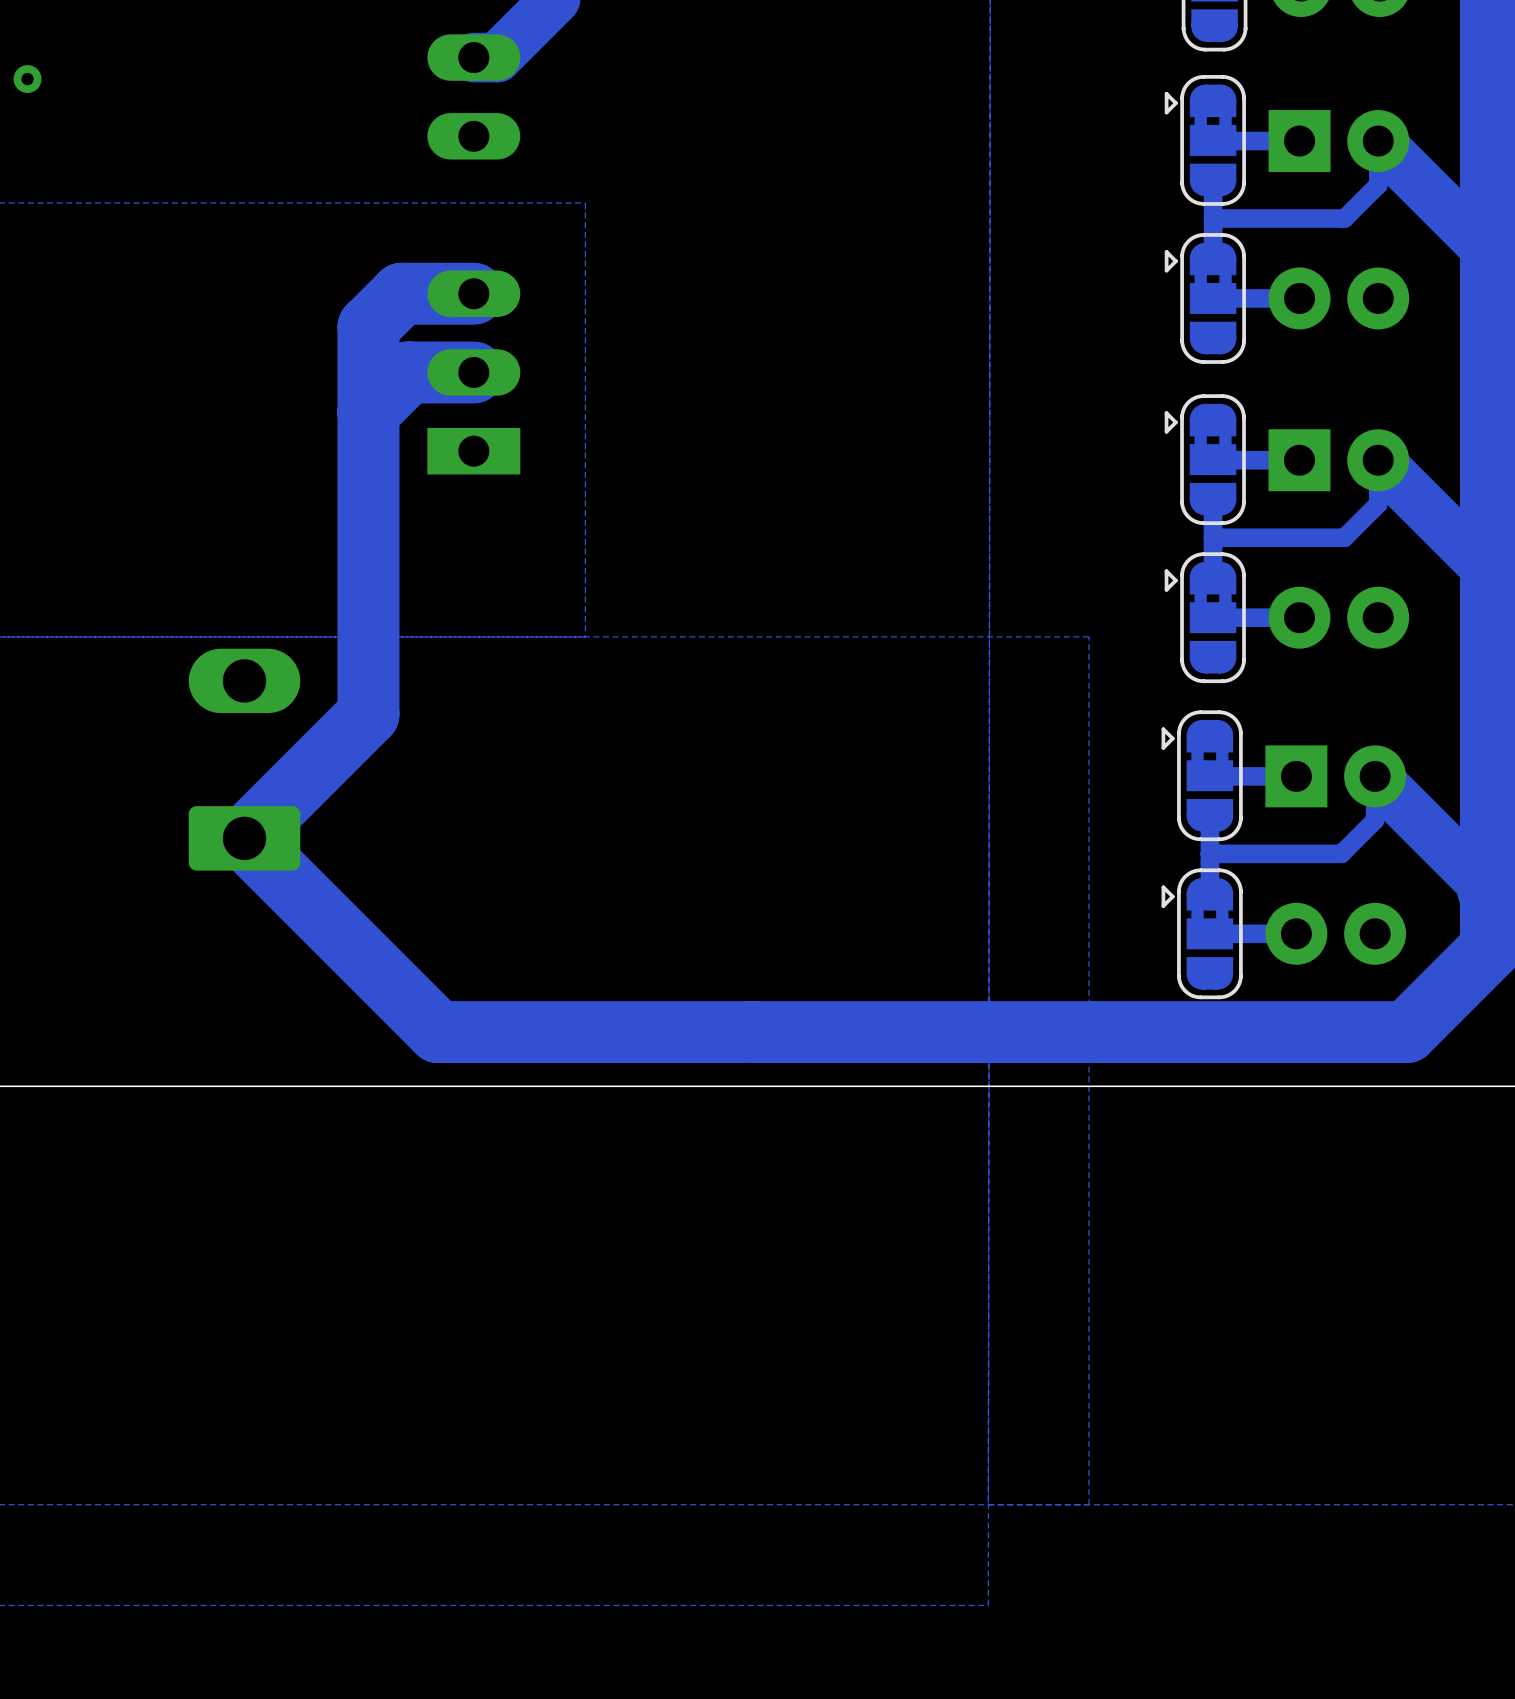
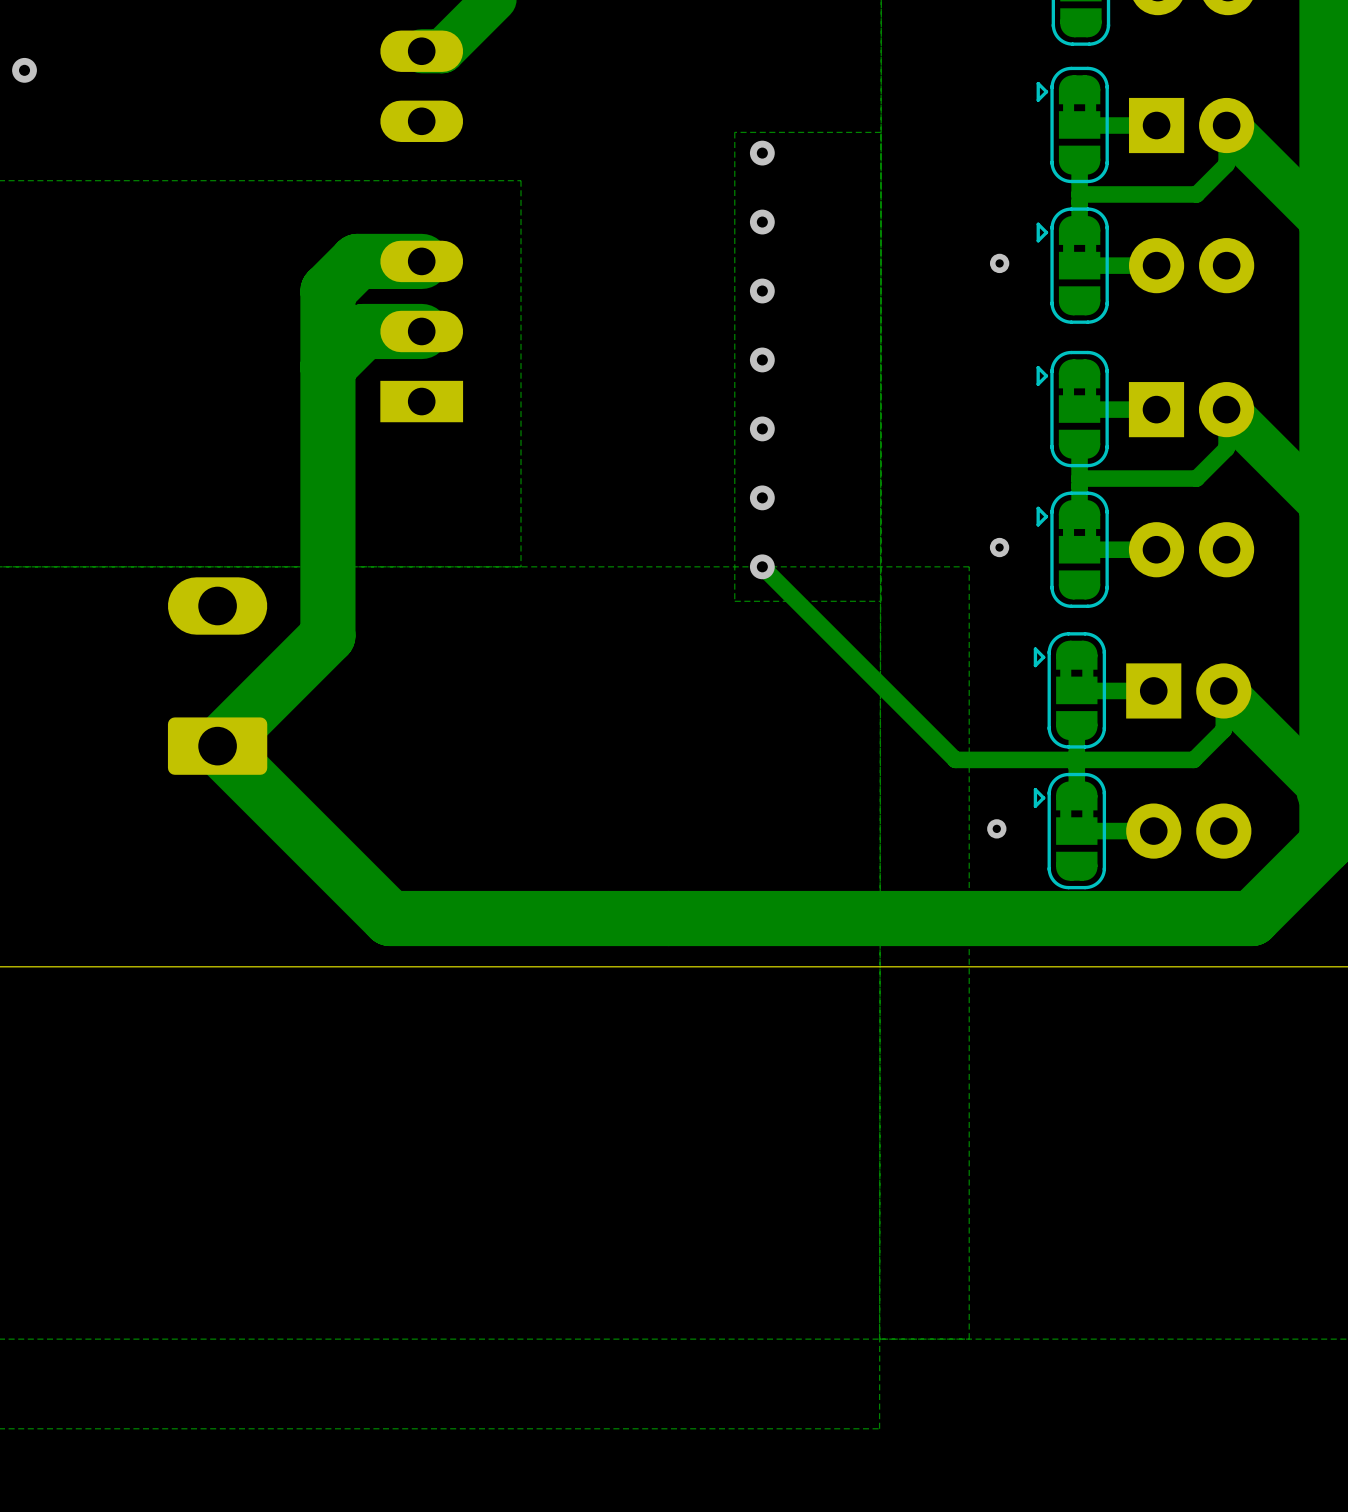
zone outline: none -> (880, 132) (734, 132) (734, 601) (880, 601) (880, 132)
via: none -> (762, 153)
via: none -> (762, 222)
via: none -> (999, 263)
via: none -> (762, 291)
via: none -> (762, 359)
via: none -> (762, 428)
via: none -> (762, 497)
via: none -> (999, 547)
track: none -> (762, 566) (955, 759) (1076, 759)
via: none -> (762, 566)
via: none -> (996, 828)

